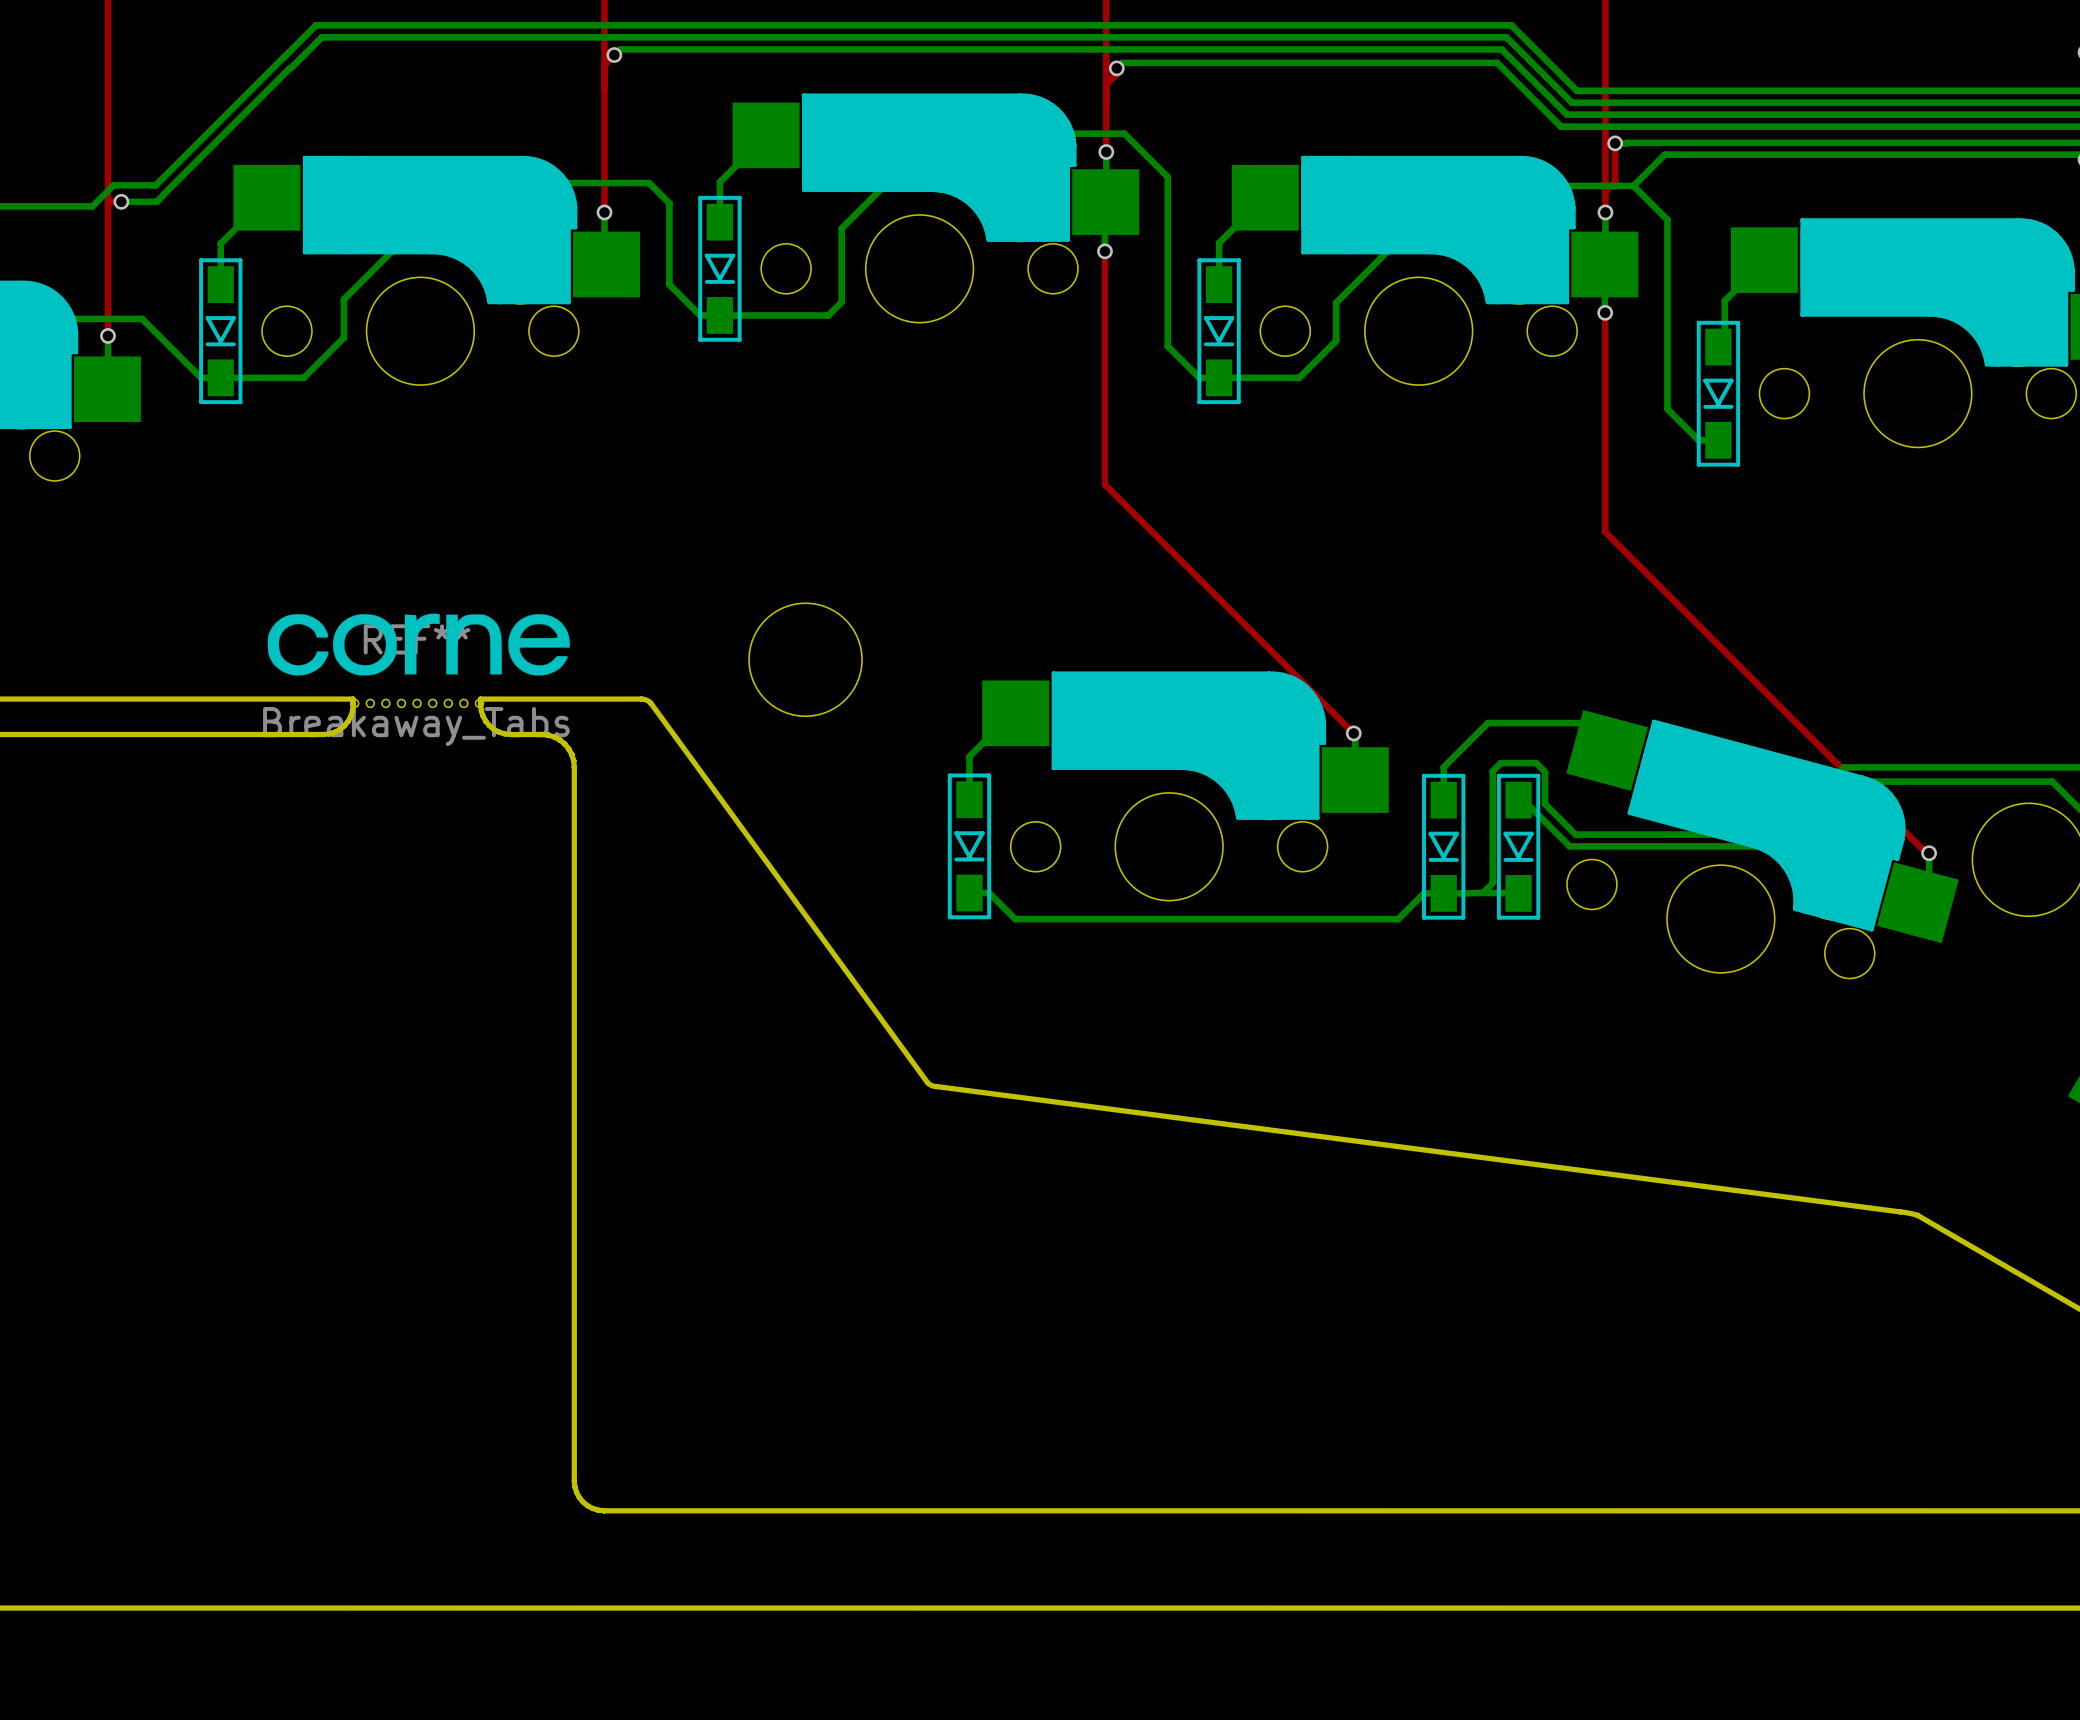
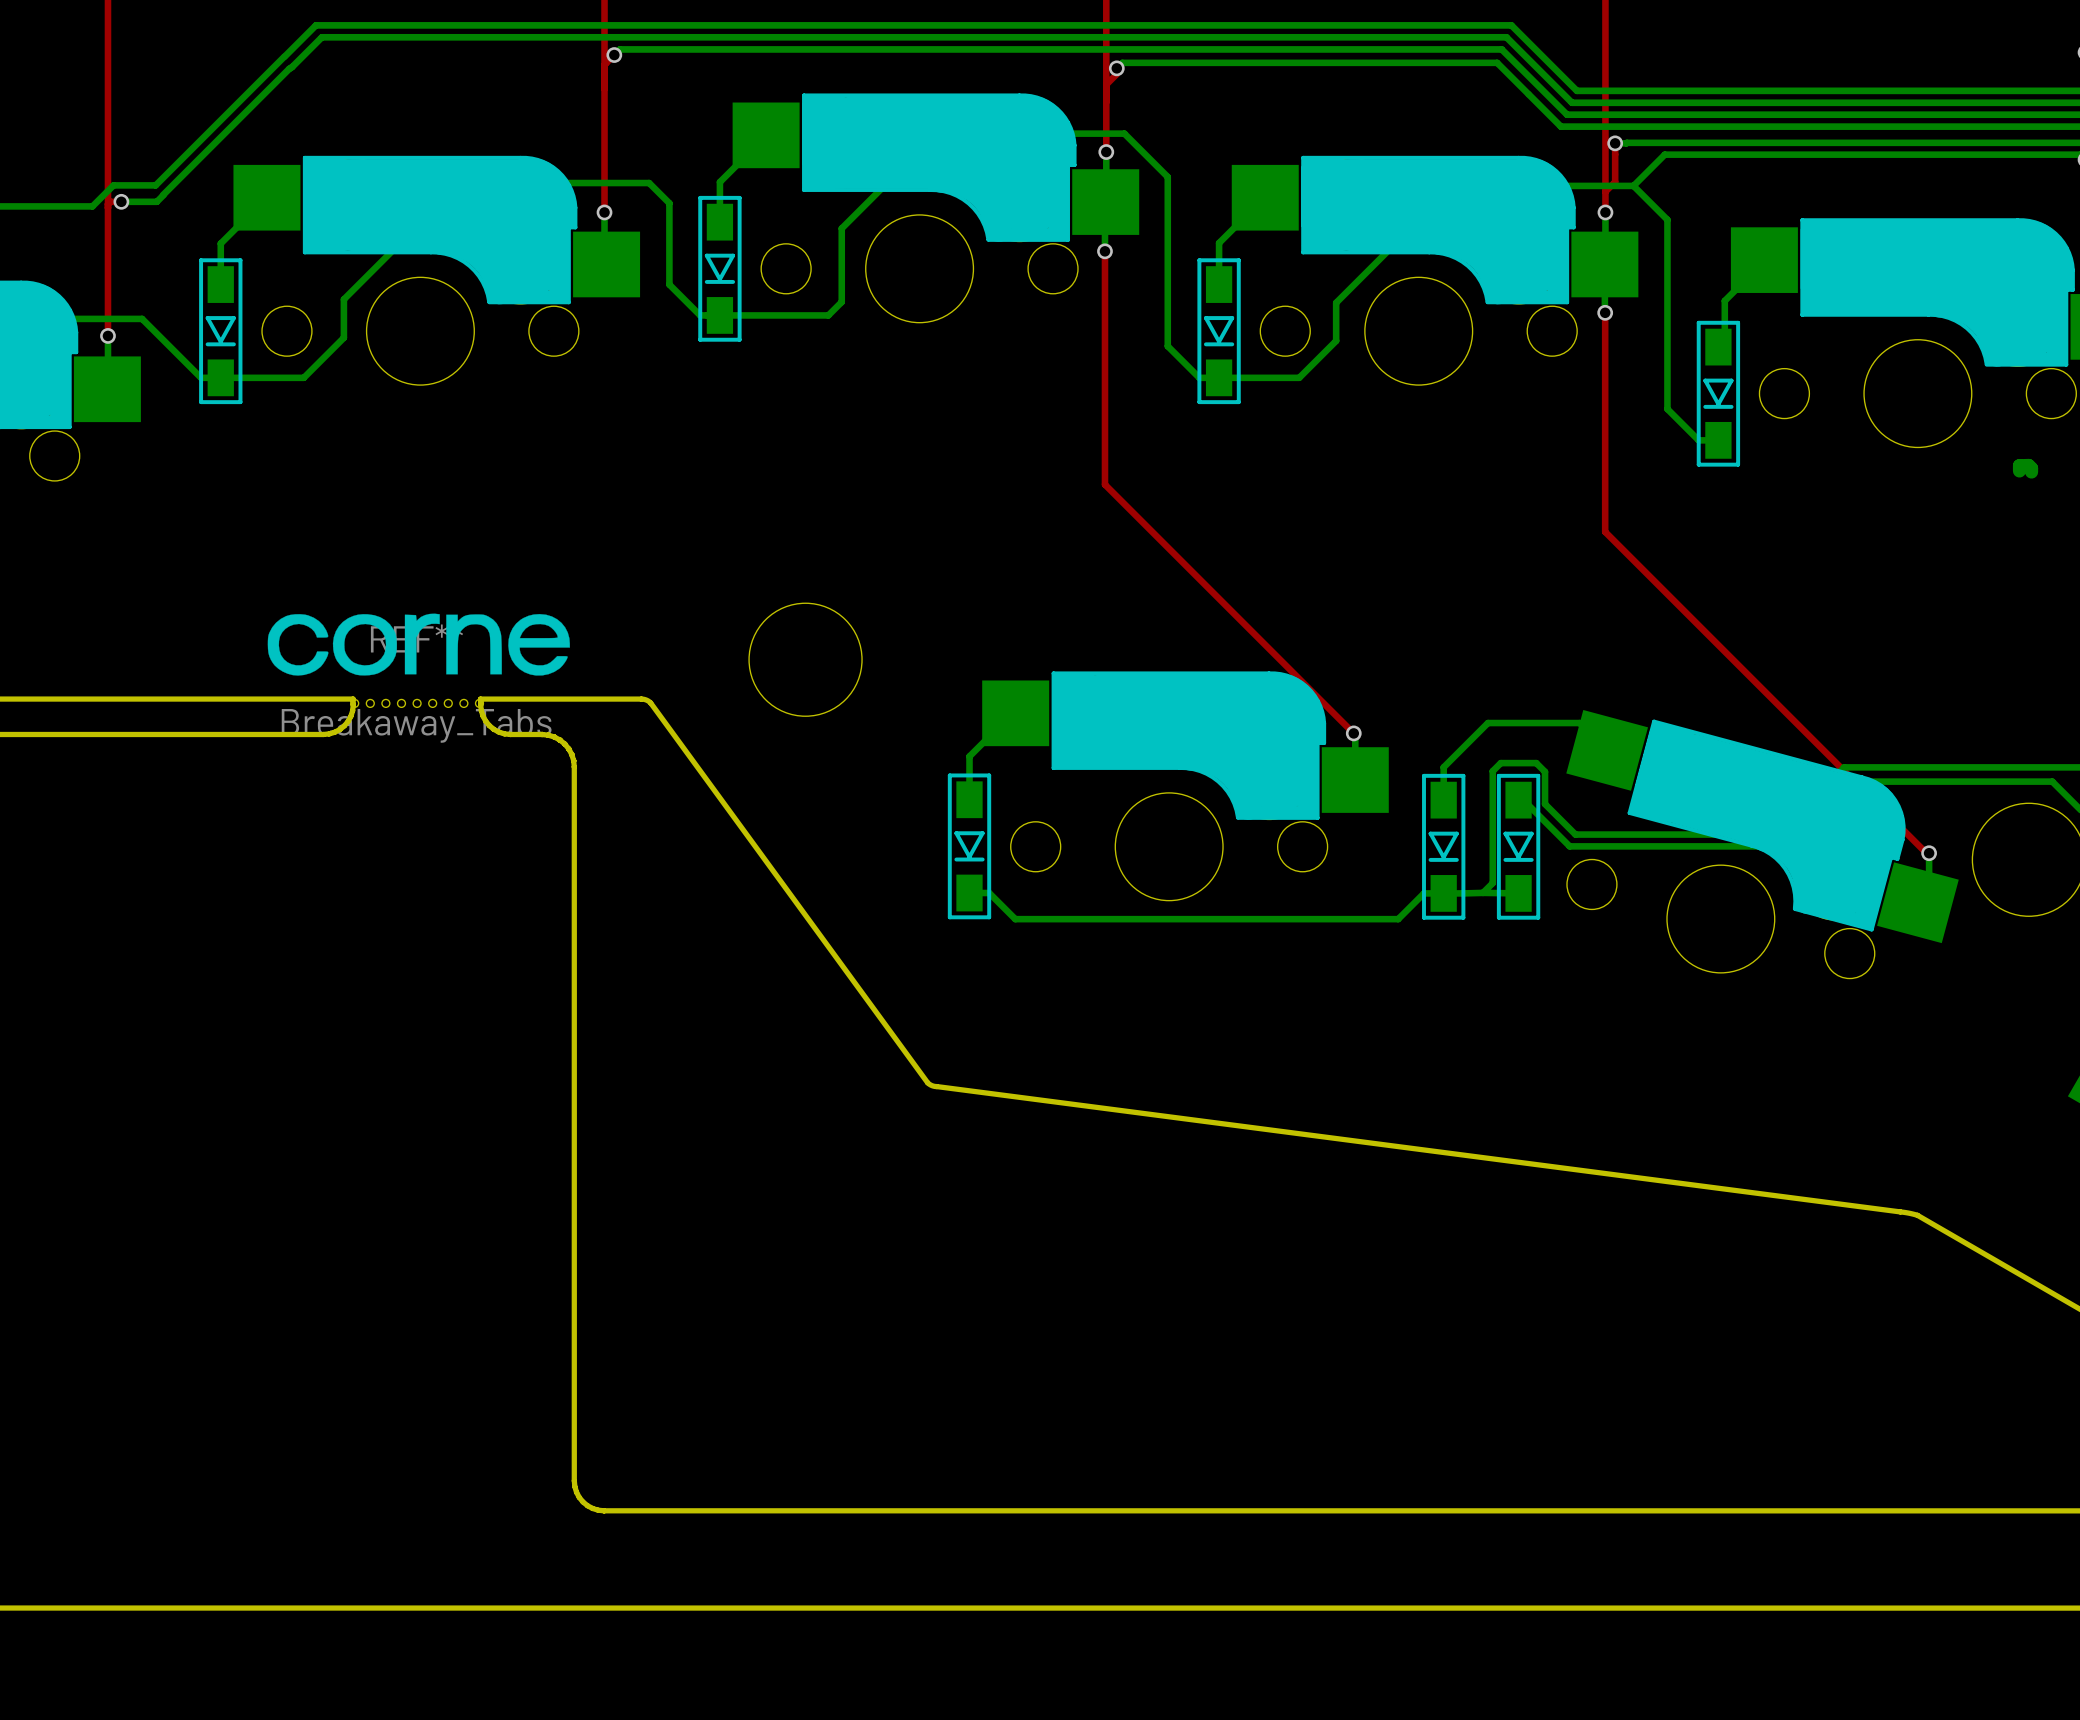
bottom track: none -> (2019, 470) (2019, 465) (2028, 465) (2031, 472)

